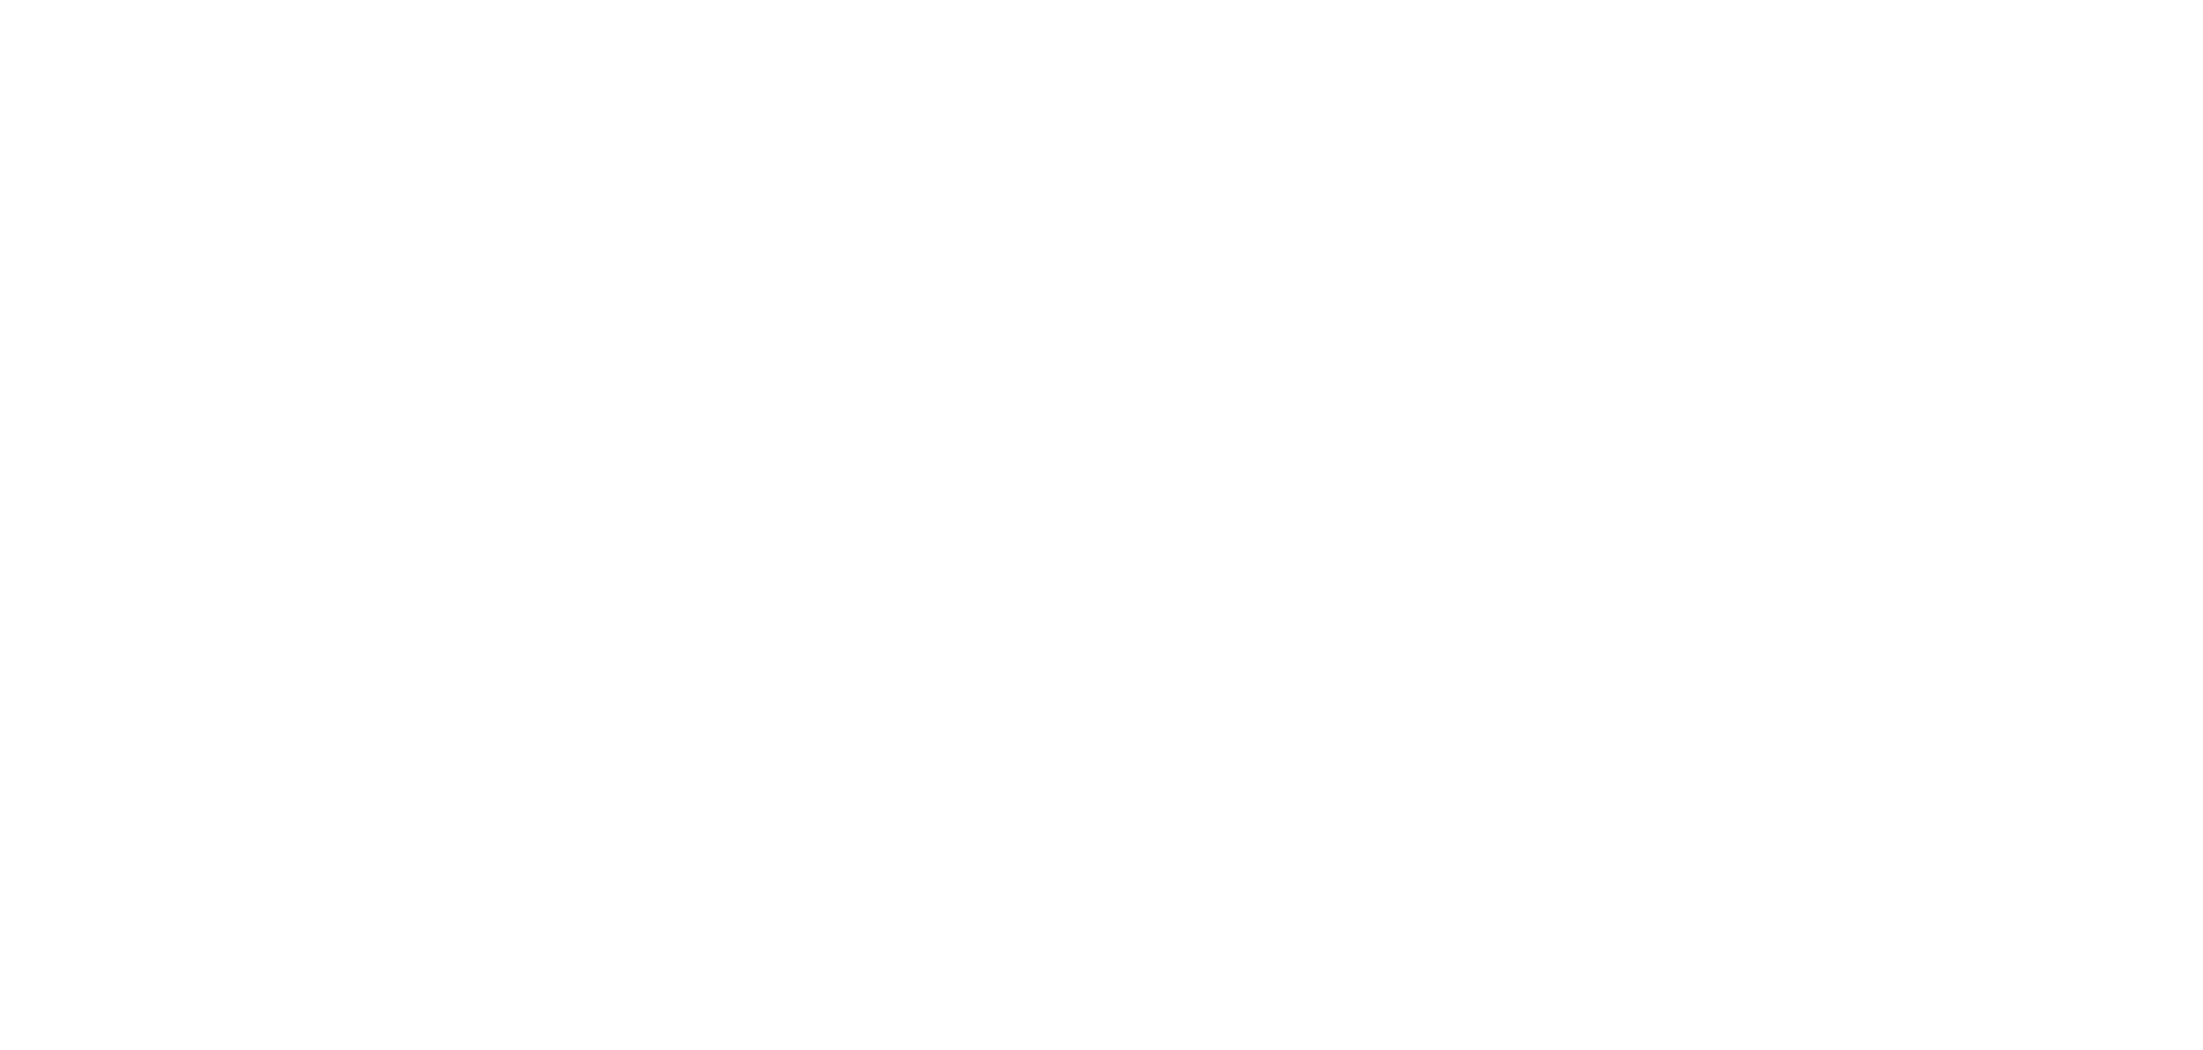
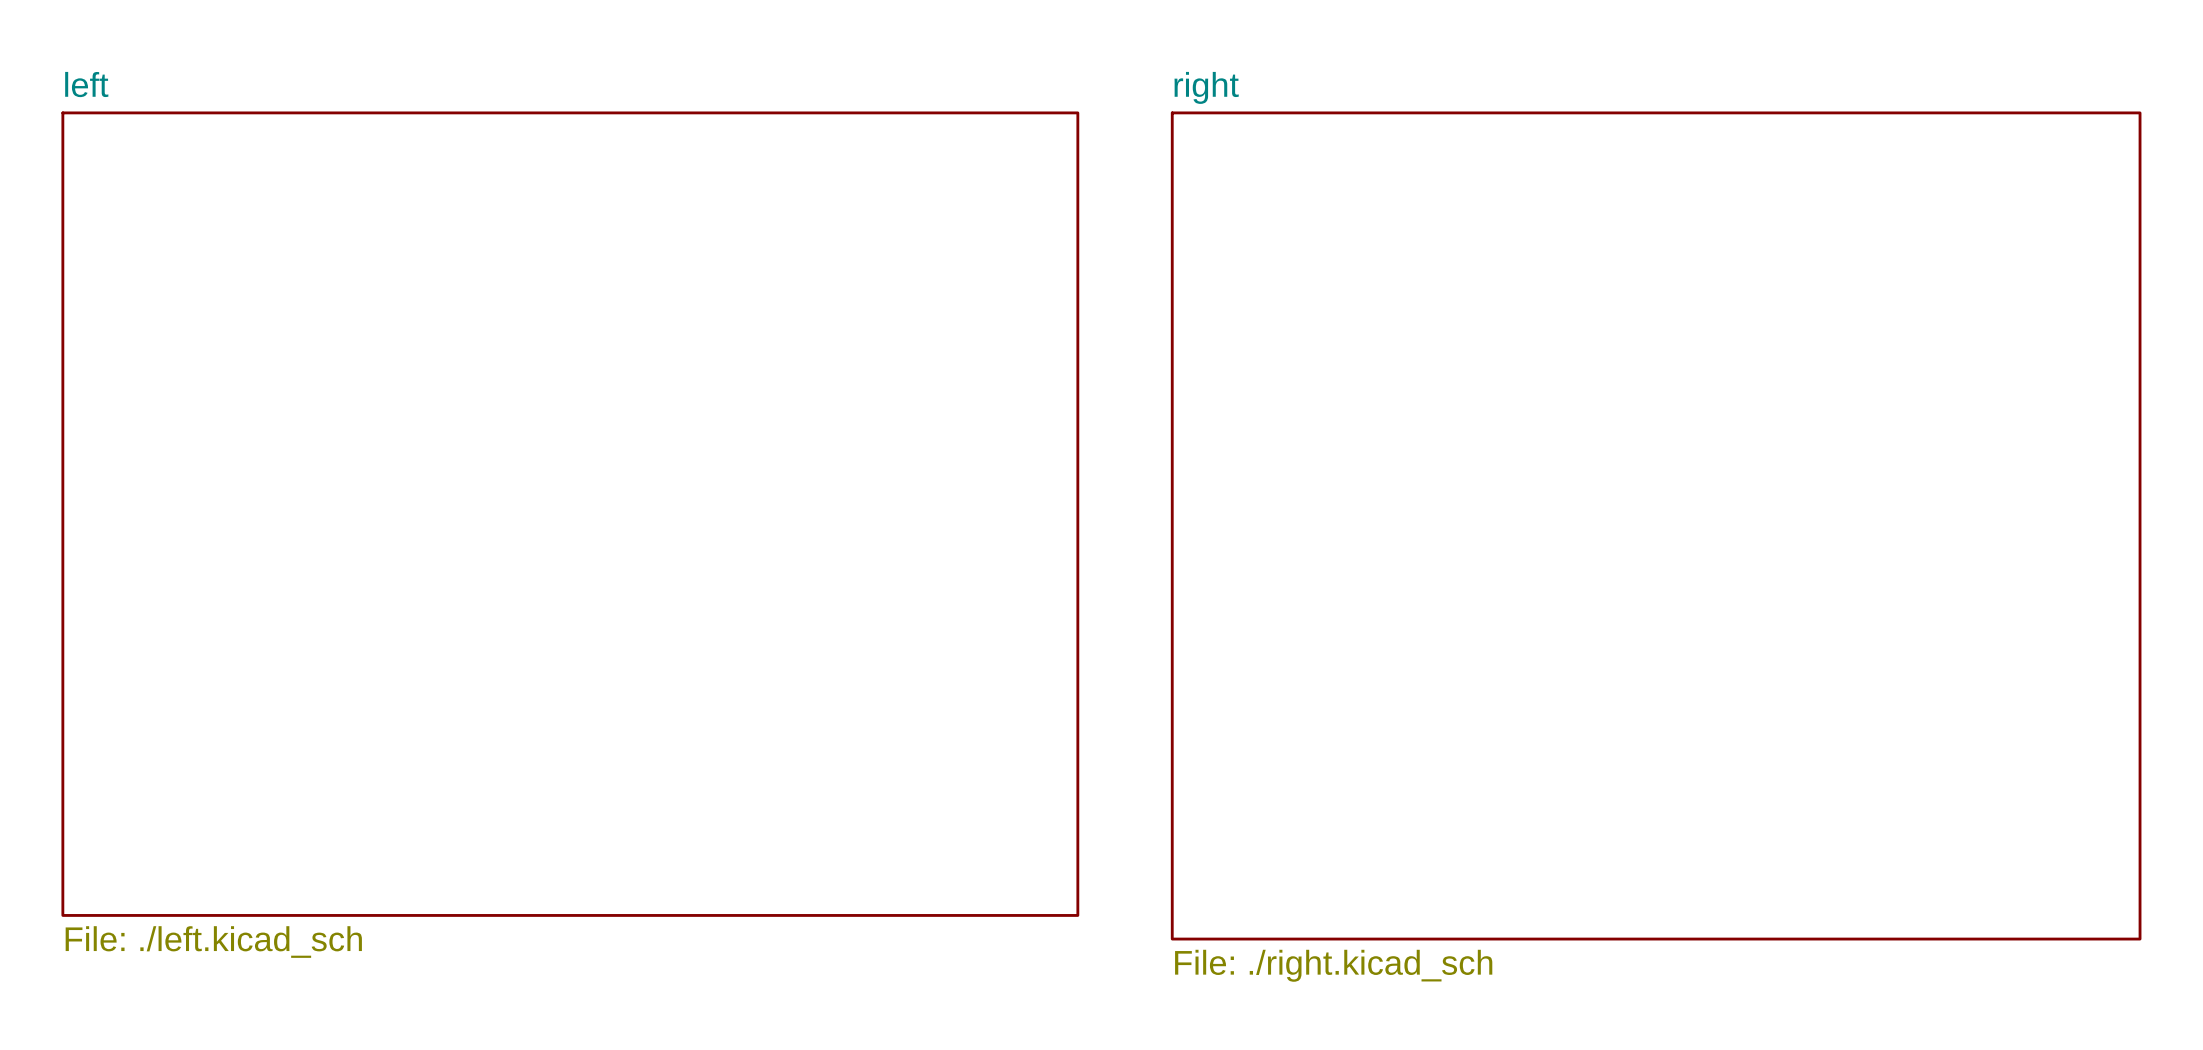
sheet left: none -> File: ./left.kicad_sch (570, 514)
sheet right: none -> File: ./right.kicad_sch (1656, 525)

